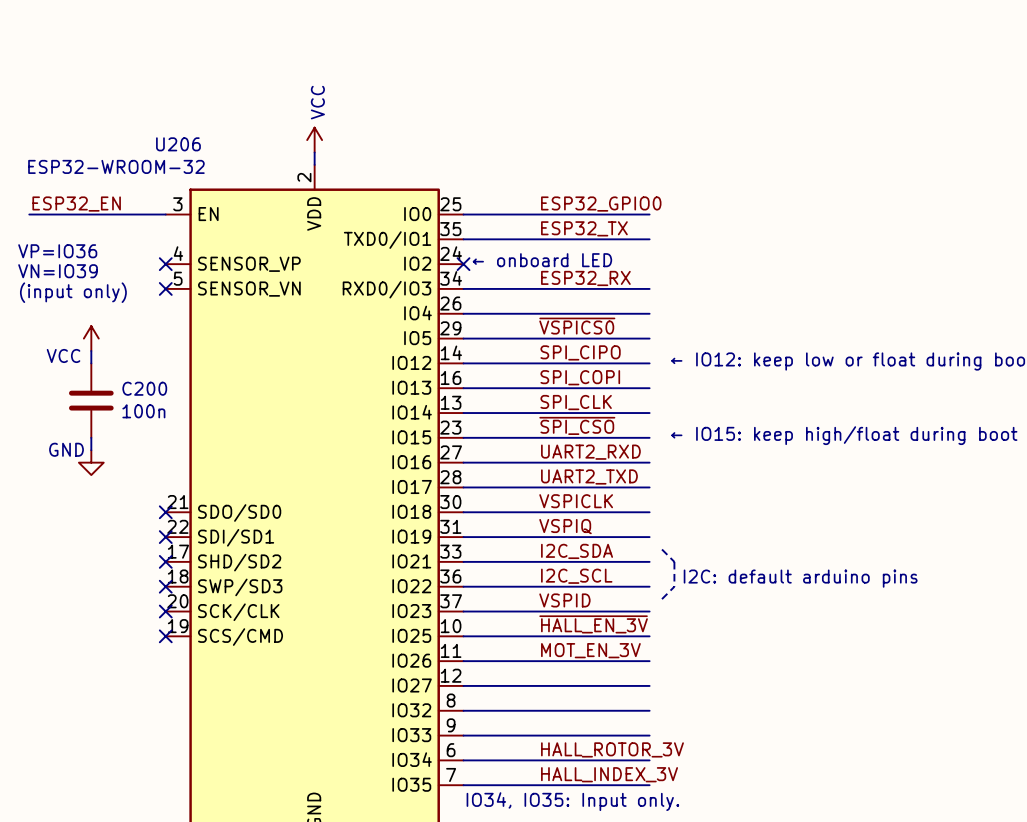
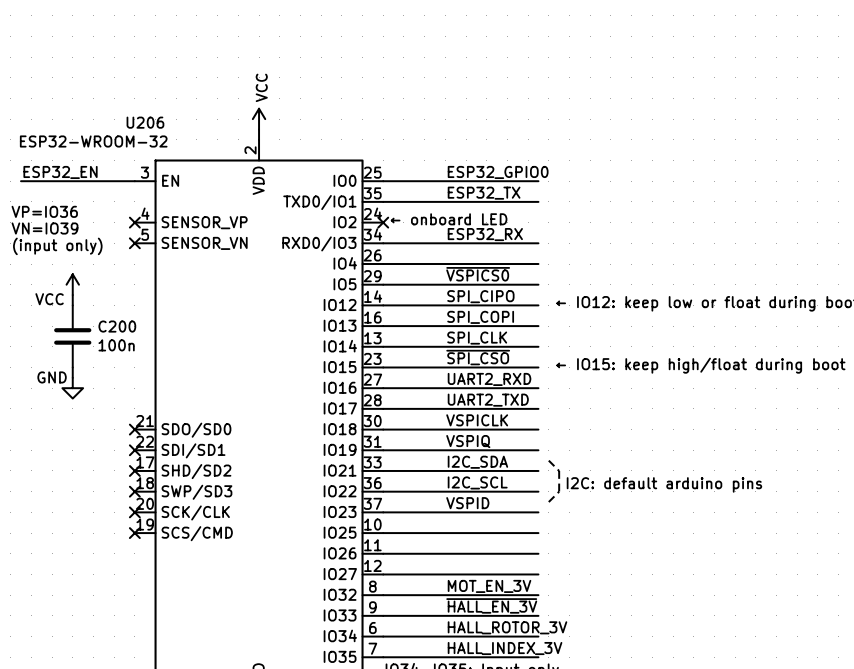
label position: ~{HALL_EN_3V} (593, 624) -> ~{HALL_EN_3V} (491, 605)
label position: MOT_EN_3V (590, 650) -> MOT_EN_3V (489, 586)

